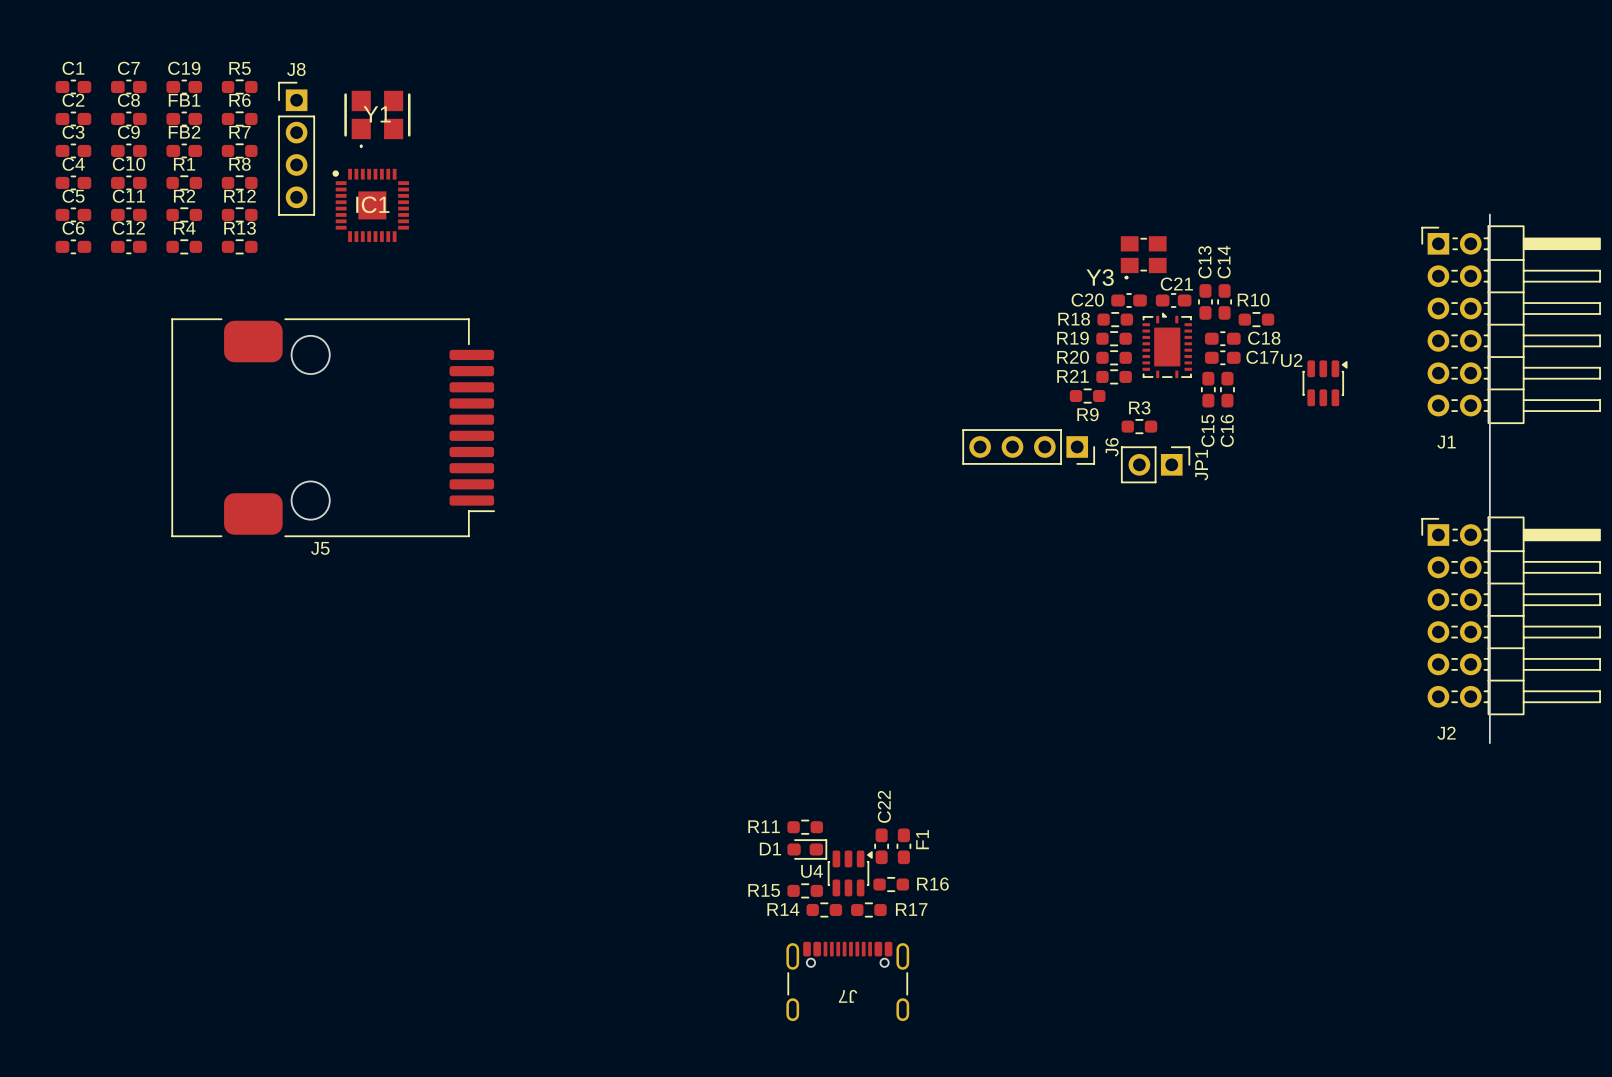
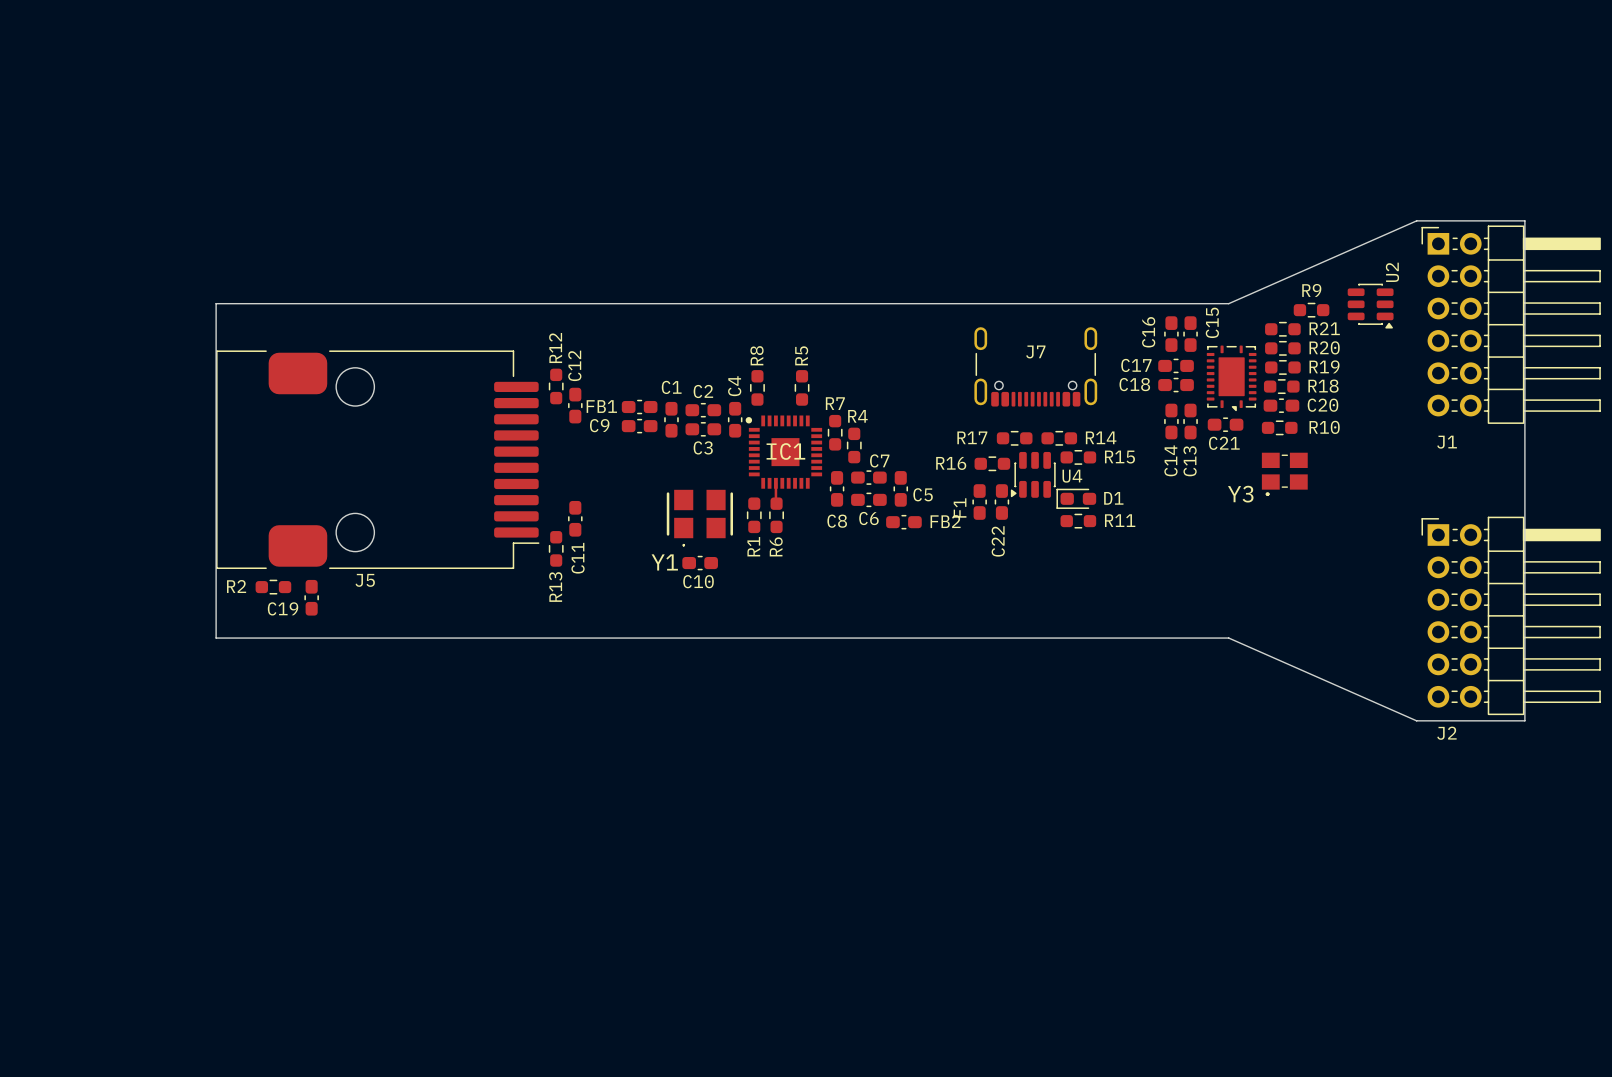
C7 name position: C7 (128, 68) -> C7 (879, 460)
C19 name position: C19 (184, 68) -> C19 (283, 608)
C1 rotation: 0° (73, 87) -> 90° clockwise (671, 419)
C1 position: (73, 87) -> (671, 419)
C7 position: (128, 87) -> (868, 477)
C19 rotation: 0° (184, 87) -> 90° clockwise (311, 597)
C19 position: (184, 87) -> (311, 597)
R5 rotation: 0° (239, 87) -> 90° clockwise (802, 387)
R5 position: (239, 87) -> (802, 387)
C8 name position: C8 (128, 100) -> C8 (837, 521)
FB1 name position: FB1 (184, 100) -> FB1 (601, 406)
R6 name position: R6 (240, 100) -> R6 (776, 546)
Y1 name position: Y1 (377, 114) -> Y1 (664, 562)
C2 position: (73, 118) -> (703, 410)
C8 rotation: 0° (128, 118) -> 90° clockwise (837, 488)
C8 position: (128, 118) -> (837, 488)
FB1 position: (184, 118) -> (639, 407)
R6 rotation: 0° (239, 118) -> 90° clockwise (776, 515)
R6 position: (239, 118) -> (776, 515)
Y1 position: (377, 119) -> (699, 518)
C3 name position: C3 (73, 132) -> C3 (703, 447)
C9 name position: C9 (128, 132) -> C9 (599, 425)
FB2 name position: FB2 (184, 132) -> FB2 (945, 521)
J8: (296, 148) -> none
C3 position: (73, 150) -> (703, 429)
C9 position: (128, 150) -> (639, 426)
FB2 position: (184, 150) -> (903, 522)
R7 rotation: 0° (239, 150) -> 90° clockwise (835, 432)
R7 position: (239, 150) -> (835, 432)
C10 name position: C10 (128, 164) -> C10 (698, 581)
R1 name position: R1 (184, 164) -> R1 (753, 546)
C4 rotation: 0° (73, 182) -> 90° clockwise (735, 419)
C4 position: (73, 182) -> (735, 419)
C10 position: (128, 182) -> (700, 563)
R1 rotation: 0° (184, 182) -> 90° clockwise (754, 515)
R1 position: (184, 182) -> (754, 515)
R8 rotation: 0° (239, 182) -> 90° clockwise (757, 387)
R8 position: (239, 182) -> (757, 387)
C11 name position: C11 (128, 196) -> C11 (578, 558)
R2 name position: R2 (184, 196) -> R2 (236, 586)
IC1 position: (370, 205) -> (783, 452)
C5 rotation: 0° (73, 214) -> 90° clockwise (900, 488)
C5 position: (73, 214) -> (900, 488)
C11 rotation: 0° (128, 214) -> 90° clockwise (575, 518)
C11 position: (128, 214) -> (575, 518)
R2 position: (184, 214) -> (273, 587)
R12 rotation: 0° (239, 214) -> 90° clockwise (556, 386)
R12 position: (239, 214) -> (556, 386)
board edge: (1489, 214) (1489, 743) -> none
board edge: none -> (1416, 220) (1228, 303) (216, 303) (216, 638) (1228, 638) (1416, 720) (1524, 720) (1524, 220) (1416, 220)
C6 name position: C6 (73, 228) -> C6 (868, 518)
R13 name position: R13 (240, 228) -> R13 (555, 587)
C6 position: (73, 246) -> (868, 499)
C12 rotation: 0° (128, 246) -> 90° clockwise (575, 405)
C12 position: (128, 246) -> (575, 405)
R4 rotation: 0° (184, 246) -> 90° clockwise (854, 445)
R4 position: (184, 246) -> (854, 445)
R13 rotation: 0° (239, 246) -> 90° clockwise (556, 548)
R13 position: (239, 246) -> (556, 548)
Y3 position: (1143, 257) -> (1284, 474)
C13 name position: C13 (1205, 262) -> C13 (1190, 461)
C14 name position: C14 (1224, 262) -> C14 (1170, 460)
C21 name position: C21 (1176, 284) -> C21 (1224, 443)
C20 name position: C20 (1087, 300) -> C20 (1322, 405)
C20 position: (1129, 300) -> (1281, 405)
C21 position: (1173, 300) -> (1225, 424)
R10 name position: R10 (1253, 300) -> R10 (1324, 427)
C13 position: (1205, 301) -> (1190, 421)
C14 position: (1224, 301) -> (1171, 421)
R18 name position: R18 (1074, 319) -> R18 (1323, 386)
R18 position: (1115, 319) -> (1281, 386)
R10 position: (1256, 319) -> (1279, 427)
R19 name position: R19 (1073, 338) -> R19 (1324, 366)
R19 position: (1114, 338) -> (1282, 367)
C18 position: (1222, 338) -> (1176, 385)
C18 name position: C18 (1264, 338) -> C18 (1134, 384)
part rotation: 0° (1167, 345) -> 180° (1231, 378)
part position: (1167, 345) -> (1231, 378)
R20 name position: R20 (1073, 357) -> R20 (1324, 347)
R20 position: (1114, 357) -> (1282, 348)
C17 position: (1222, 357) -> (1176, 365)
C17 name position: C17 (1262, 357) -> C17 (1136, 365)
R21 name position: R21 (1072, 376) -> R21 (1324, 328)
R21 position: (1114, 376) -> (1282, 329)
U2 rotation: 0° (1325, 383) -> 90° clockwise (1370, 306)
U2 position: (1325, 383) -> (1370, 306)
C15 position: (1208, 389) -> (1190, 334)
C16 position: (1227, 389) -> (1171, 334)
R9 position: (1087, 396) -> (1311, 310)
R9 name position: R9 (1087, 414) -> R9 (1311, 290)
R3: (1139, 426) -> none
J5 position: (333, 427) -> (377, 459)
C15 name position: C15 (1207, 430) -> C15 (1212, 322)
C16 name position: C16 (1227, 430) -> C16 (1148, 332)
J6: (1028, 446) -> none
JP1: (1155, 464) -> none
track: none -> (775, 483) (776, 503)
C22 name position: C22 (884, 806) -> C22 (998, 541)
R11 name position: R11 (764, 826) -> R11 (1120, 520)
R11 position: (805, 827) -> (1078, 521)
F1 name position: F1 (922, 839) -> F1 (960, 507)
C22 position: (881, 846) -> (1001, 502)
F1 position: (903, 846) -> (979, 502)
D1 rotation: 0° (807, 849) -> 180° (1076, 498)
D1 position: (807, 849) -> (1076, 498)
U4 rotation: 0° (850, 873) -> 180° (1033, 474)
U4 position: (850, 873) -> (1033, 474)
R16 position: (891, 884) -> (992, 463)
R16 name position: R16 (932, 884) -> R16 (951, 463)
R15 name position: R15 (764, 890) -> R15 (1119, 457)
R15 position: (805, 890) -> (1078, 457)
R14 name position: R14 (783, 909) -> R14 (1101, 437)
R14 position: (824, 909) -> (1059, 438)
R17 position: (868, 909) -> (1014, 438)
R17 name position: R17 (911, 909) -> R17 (972, 437)
J7 rotation: 0° (847, 981) -> 180° (1035, 366)
J7 position: (847, 981) -> (1035, 366)

